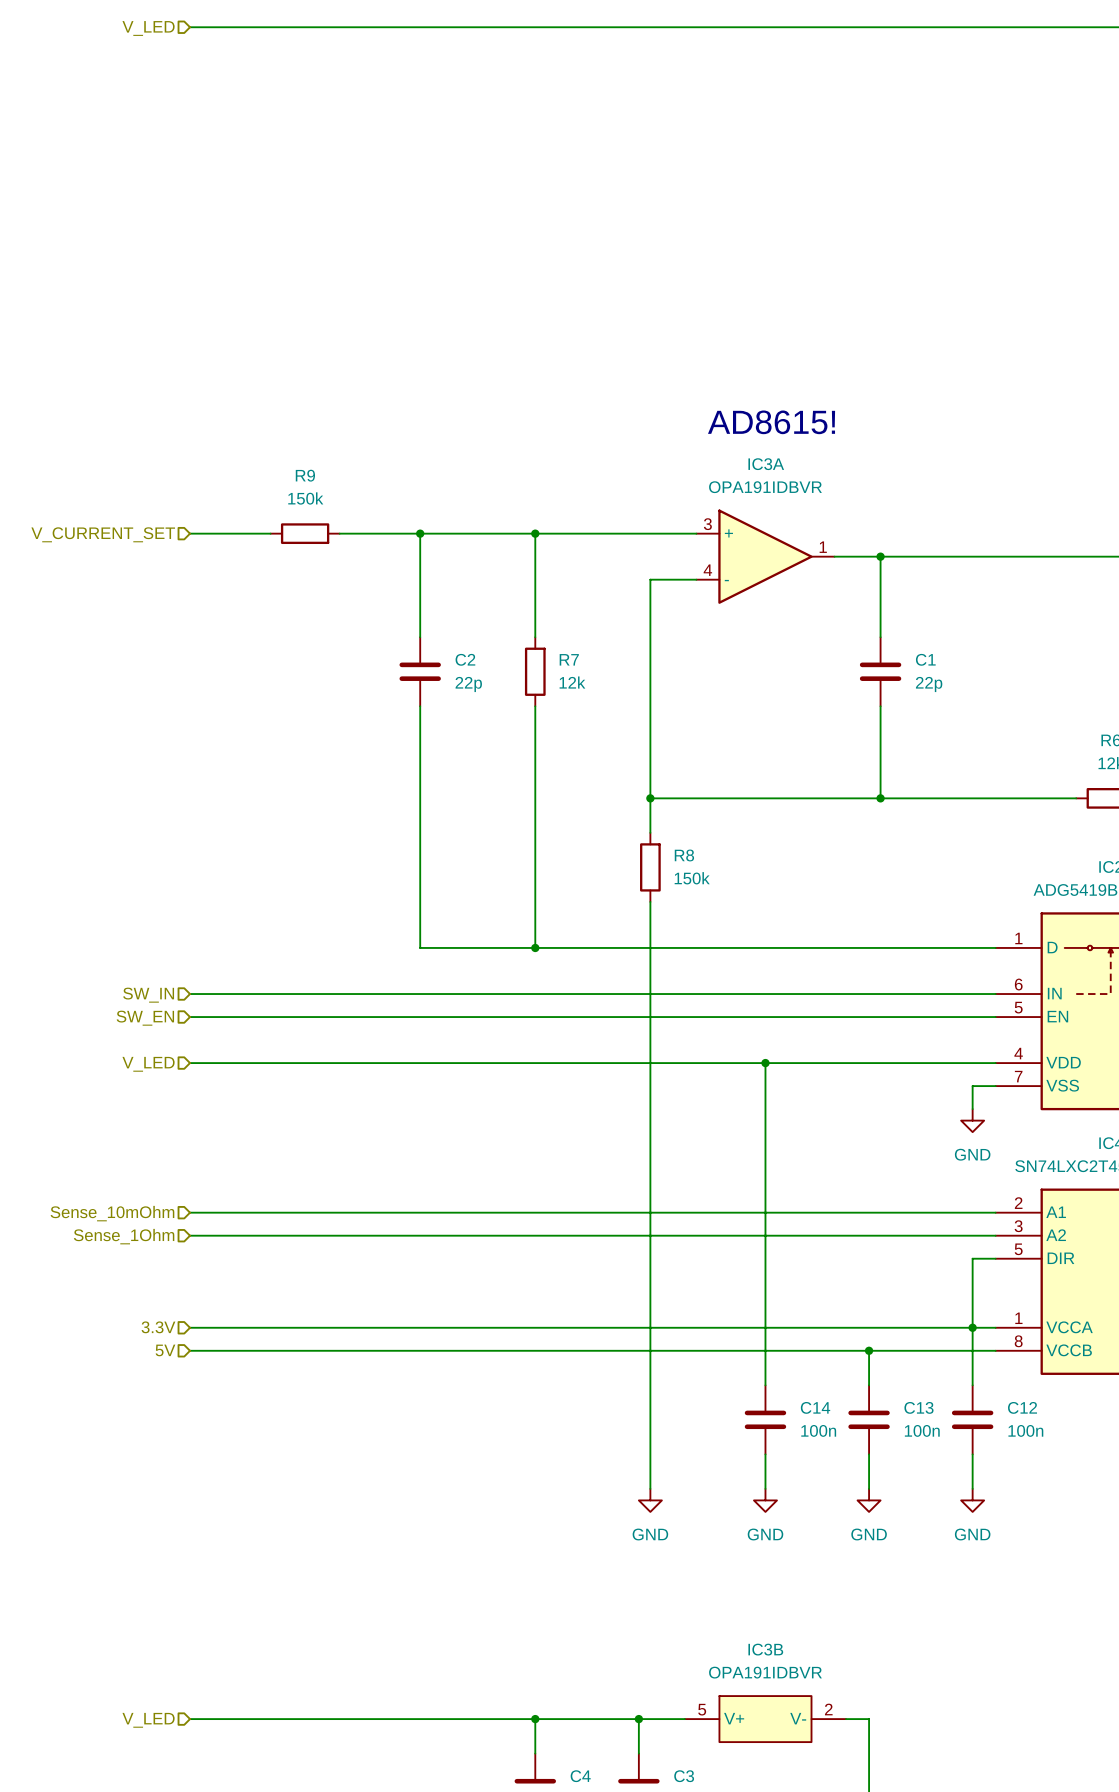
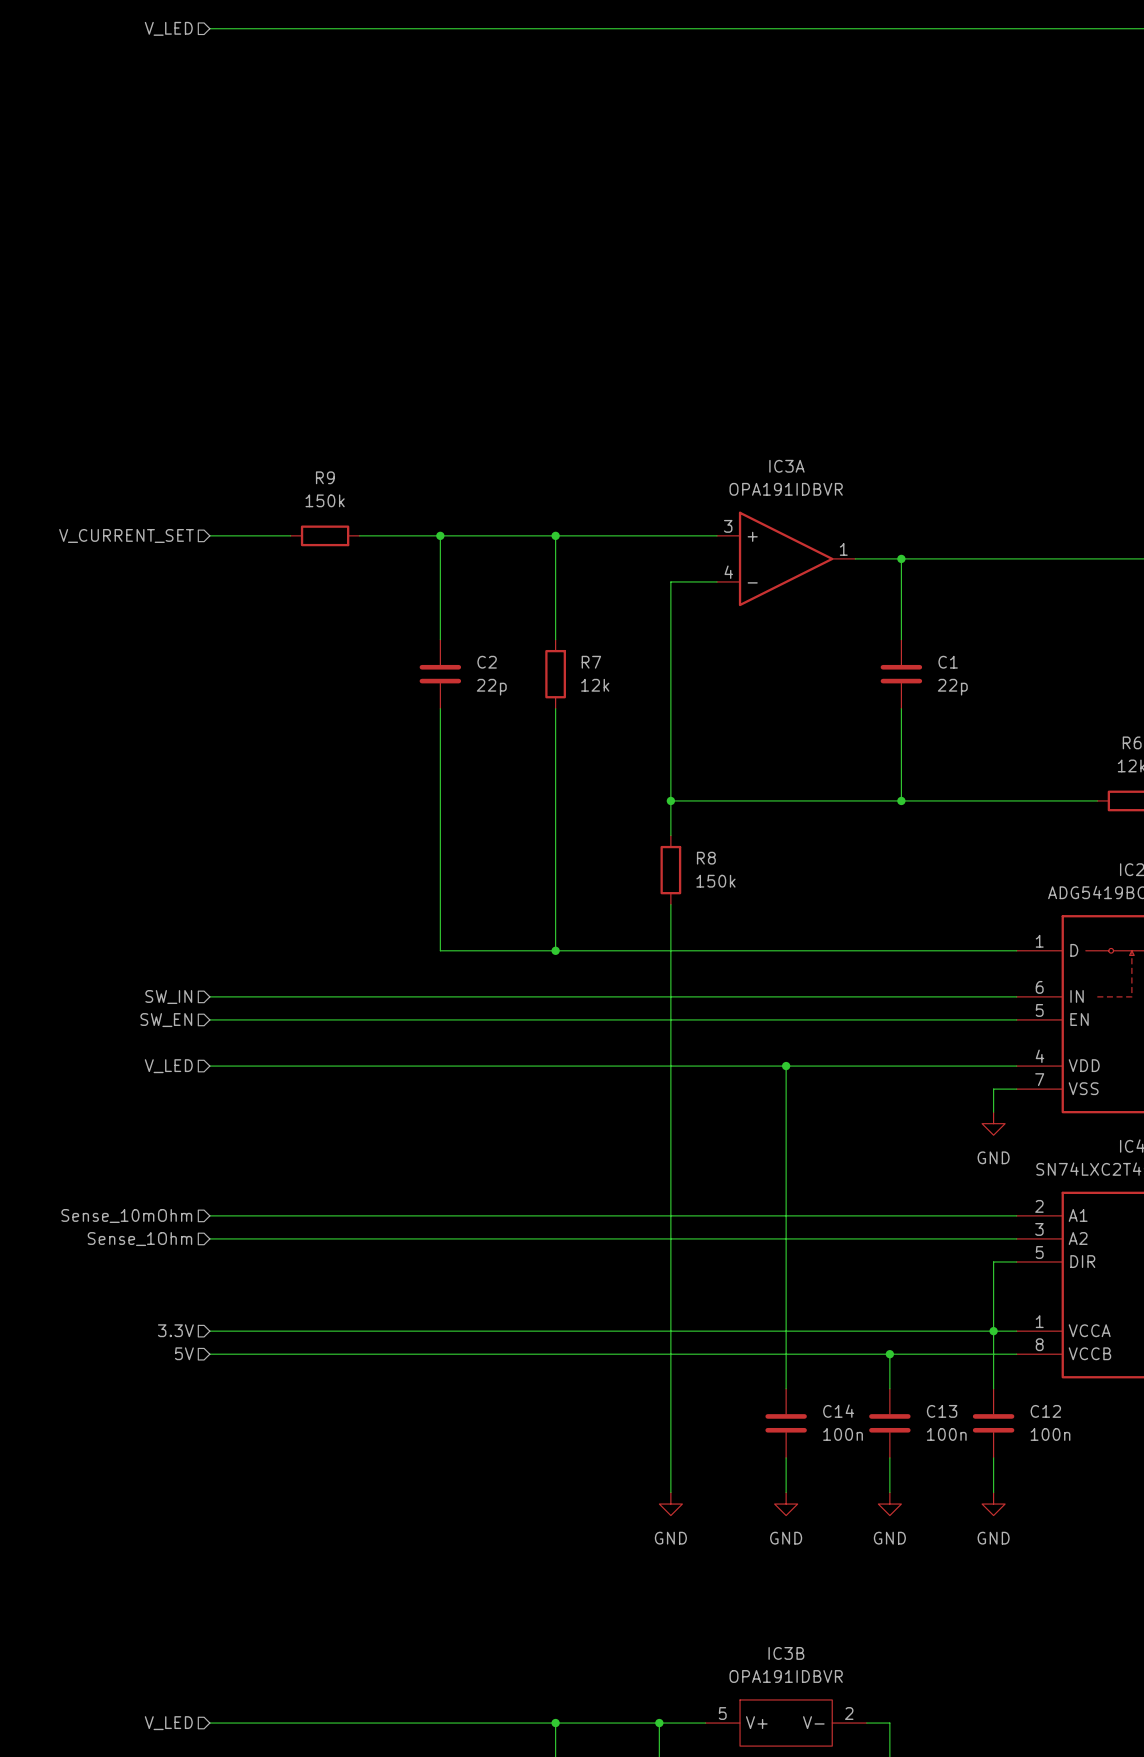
text: AD8615! (771, 422) -> none

